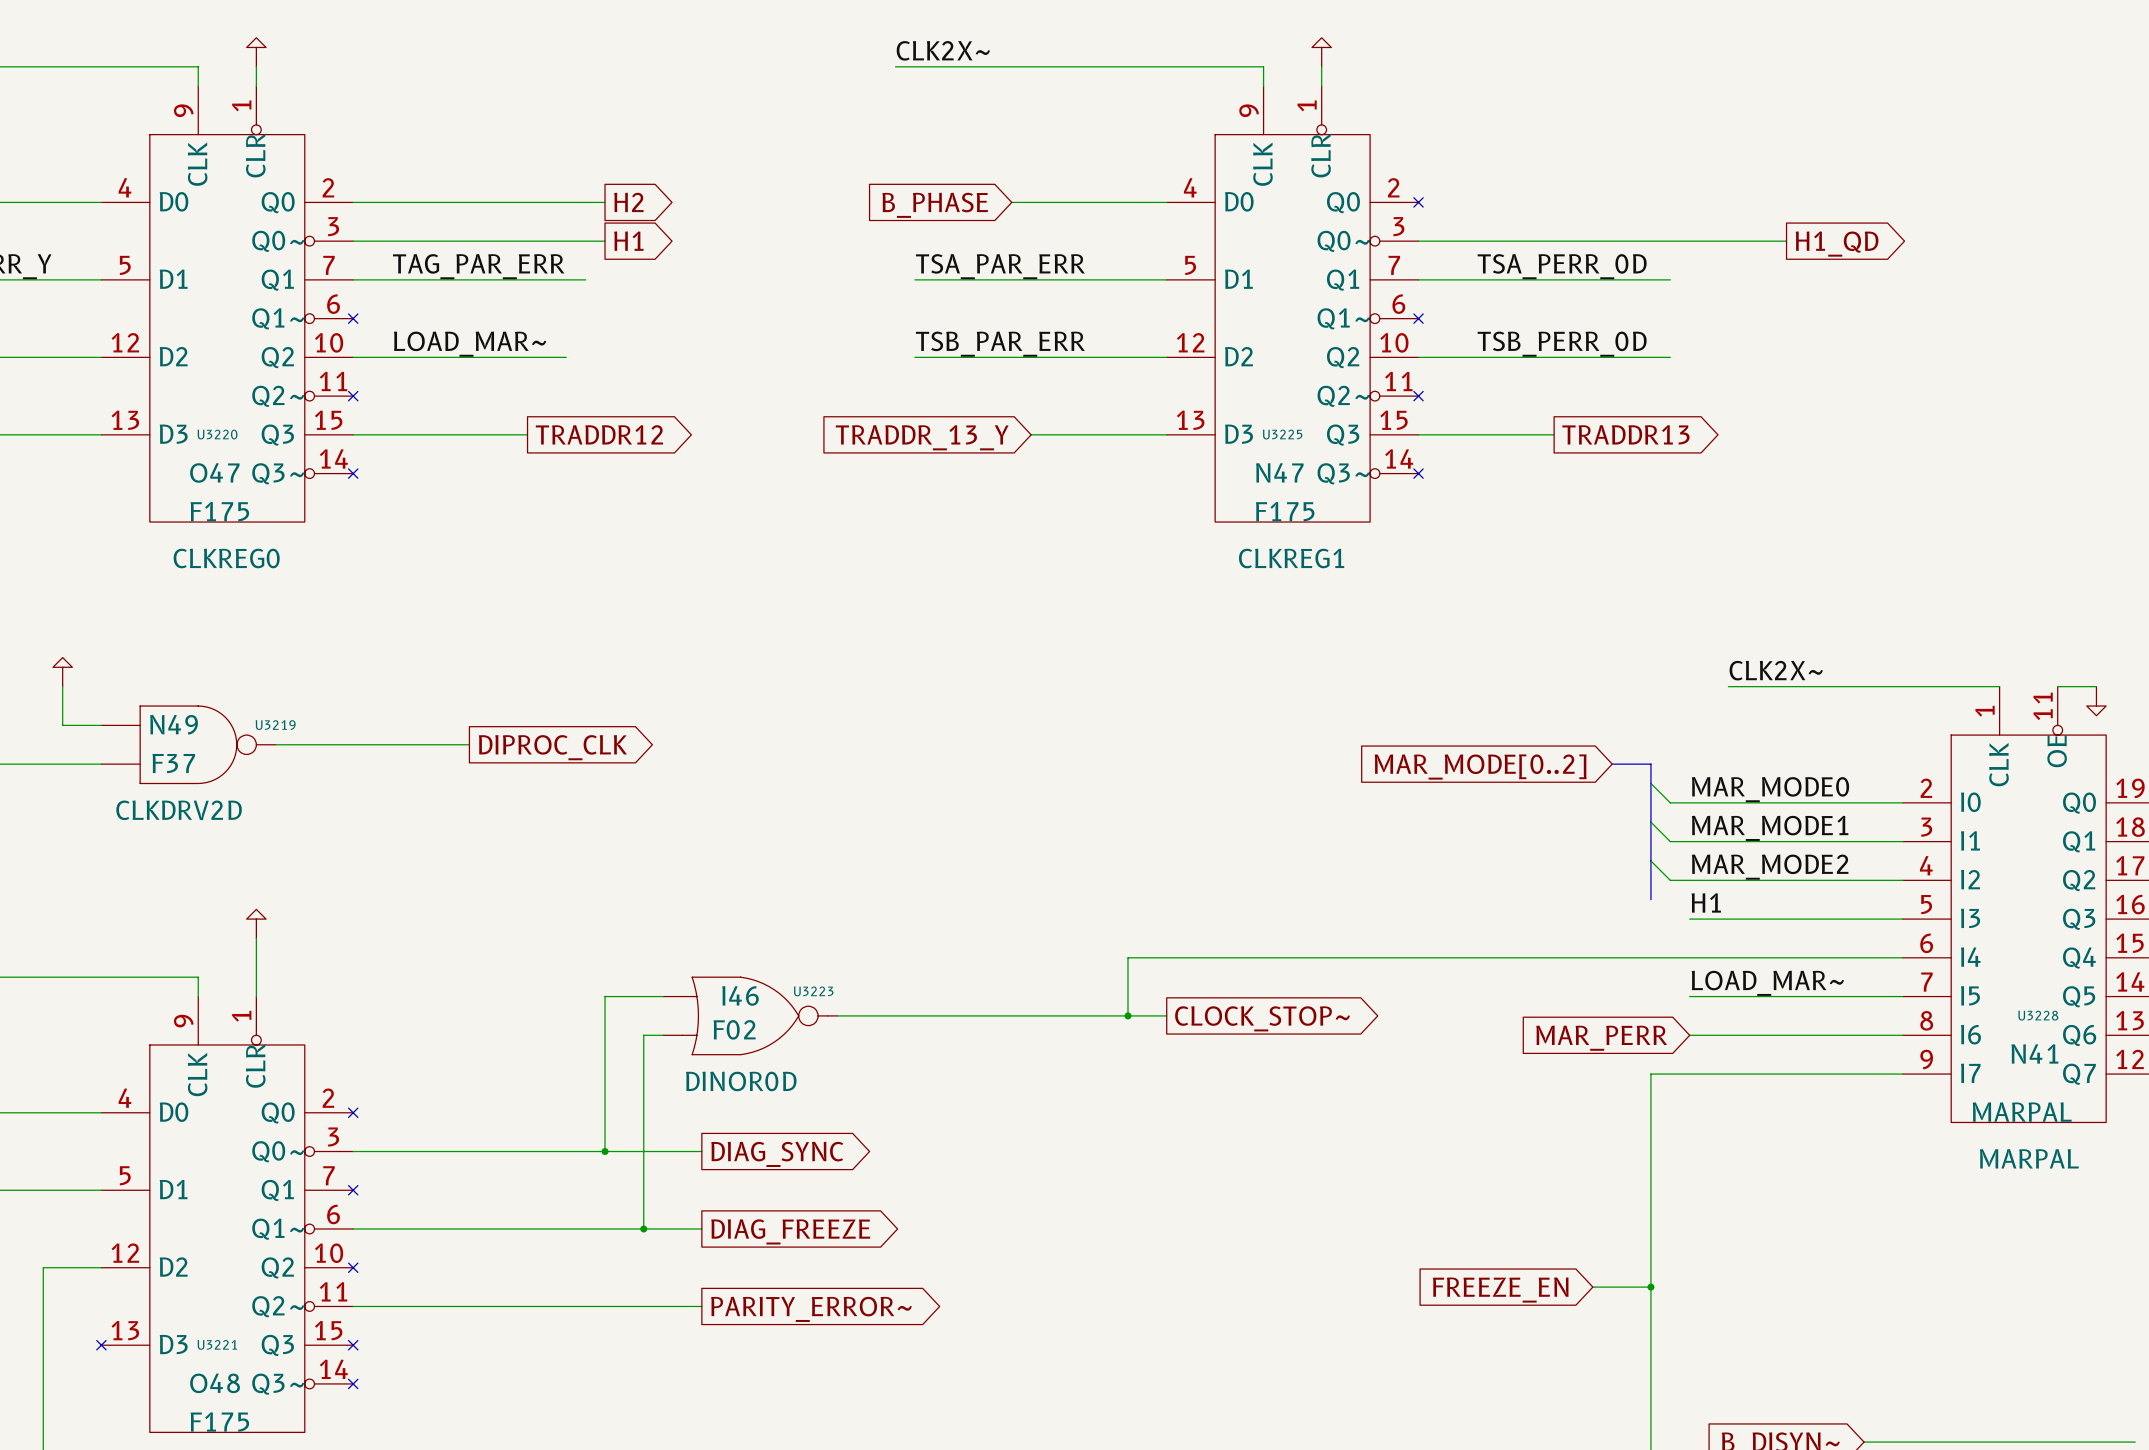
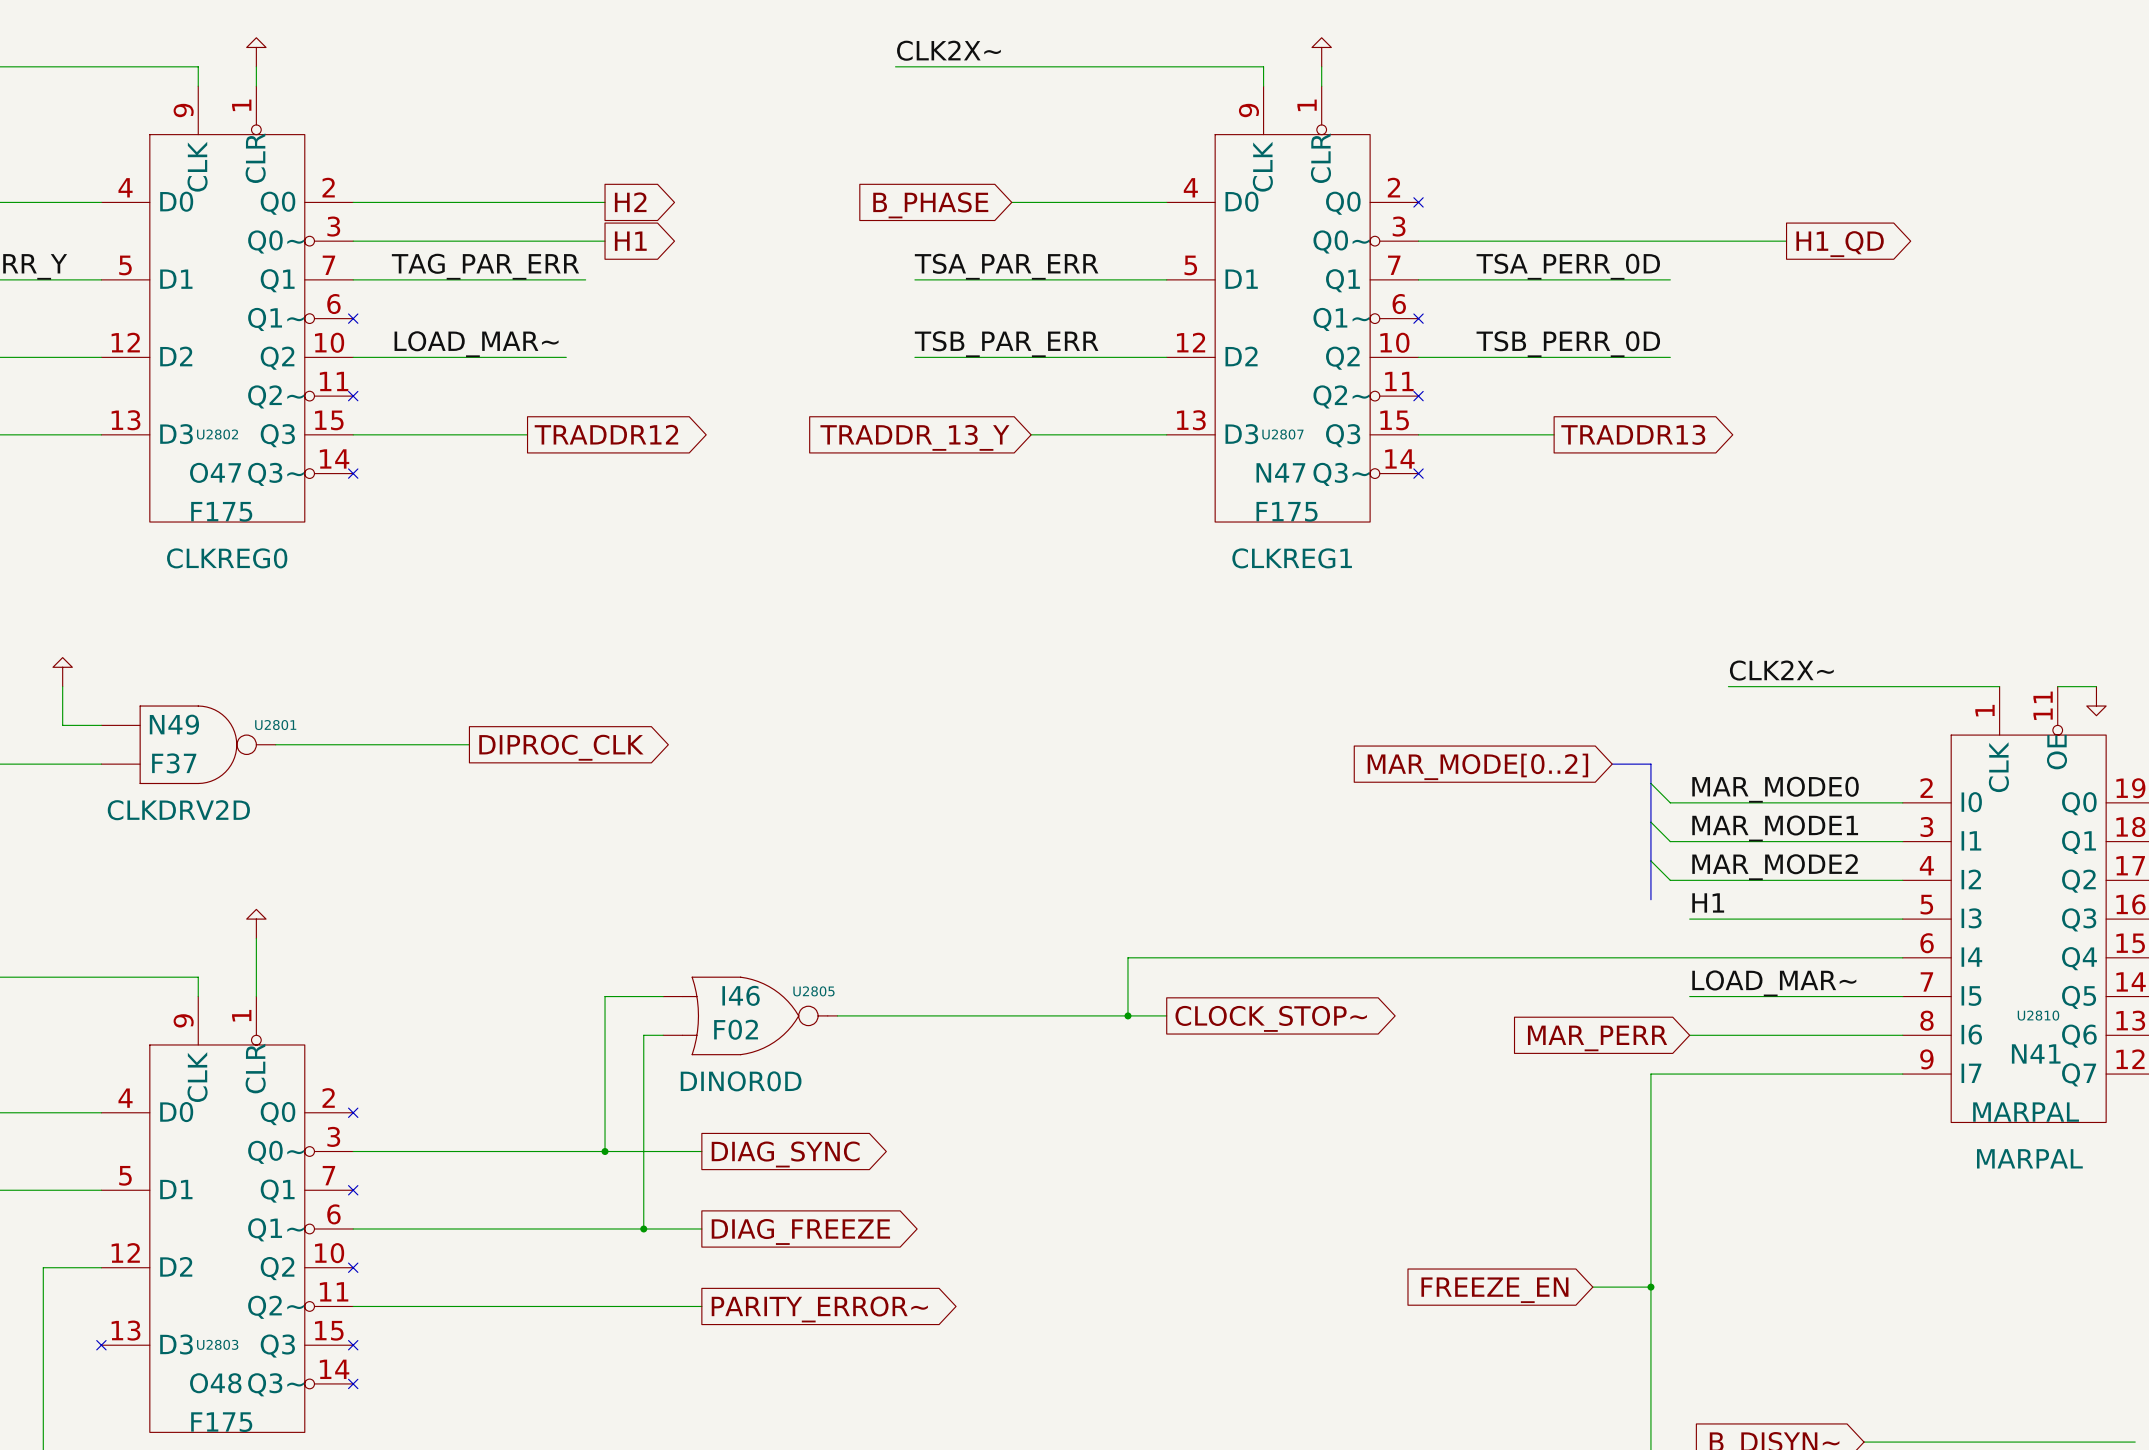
U3220 name: U3220 (217, 434) -> U2802 (217, 434)
U3225 name: U3225 (1282, 434) -> U2807 (1282, 434)
U3219 name: U3219 (275, 725) -> U2801 (275, 725)
U3223 name: U3223 (813, 991) -> U2805 (813, 991)
U3228 name: U3228 (2038, 1015) -> U2810 (2038, 1015)
U3221 name: U3221 (217, 1344) -> U2803 (217, 1344)

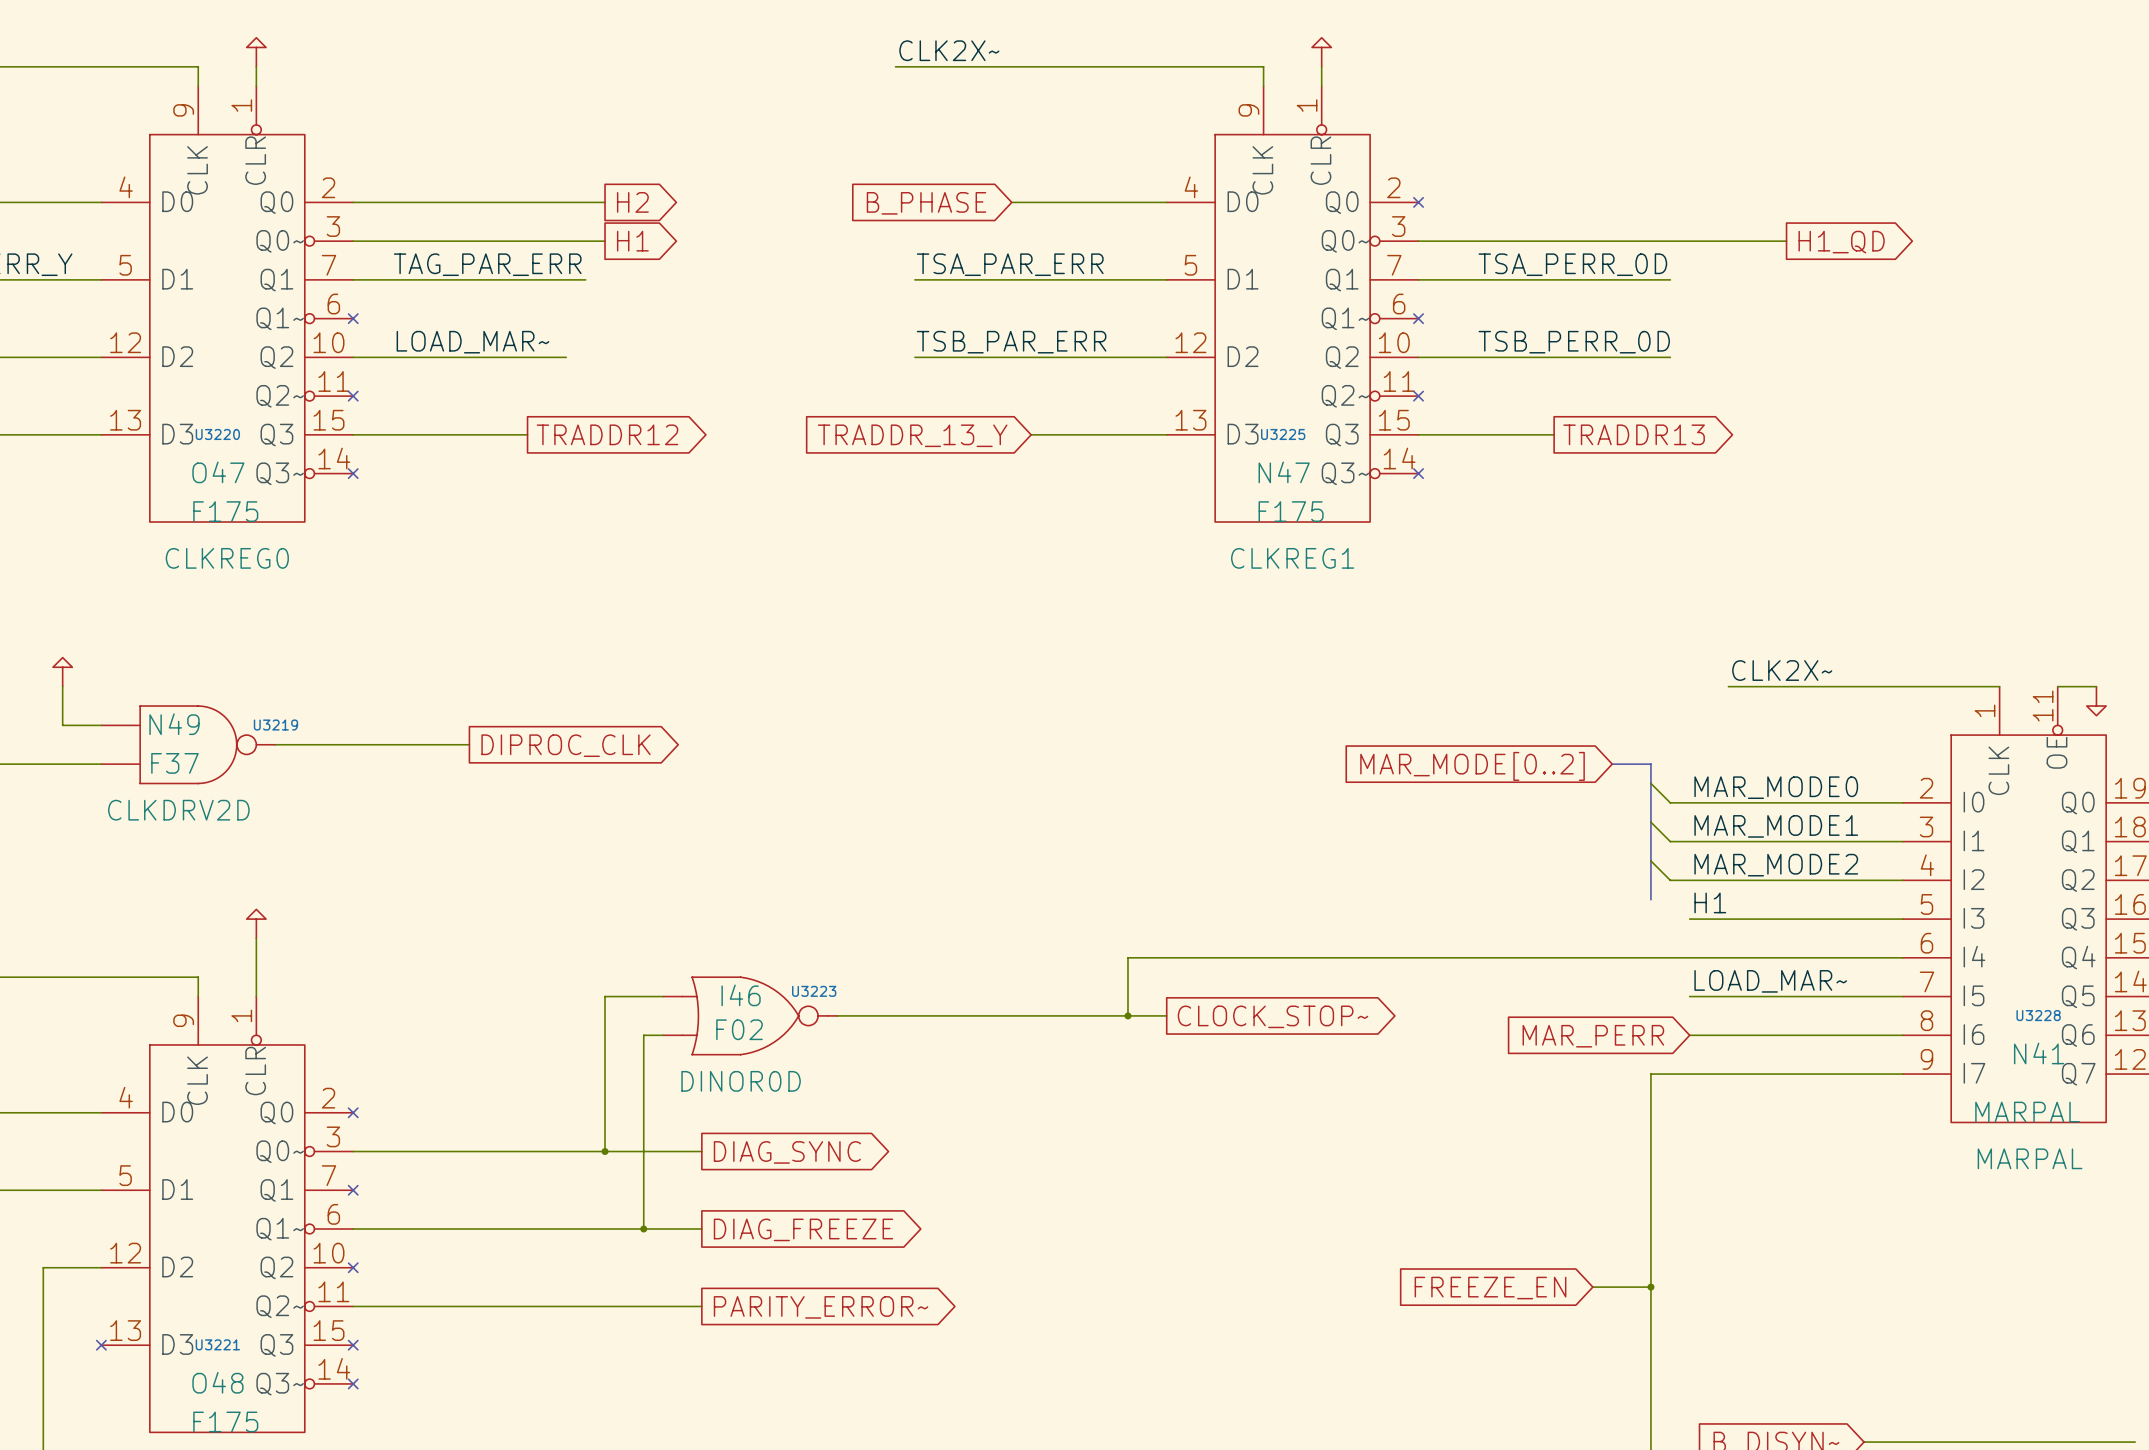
U2802 name: U2802 (217, 434) -> U3220 (217, 434)
U2807 name: U2807 (1282, 434) -> U3225 (1283, 434)
U2801 name: U2801 (275, 725) -> U3219 (275, 725)
U2805 name: U2805 (813, 991) -> U3223 (814, 991)
U2810 name: U2810 (2038, 1015) -> U3228 (2038, 1015)
U2803 name: U2803 (217, 1344) -> U3221 (217, 1344)

